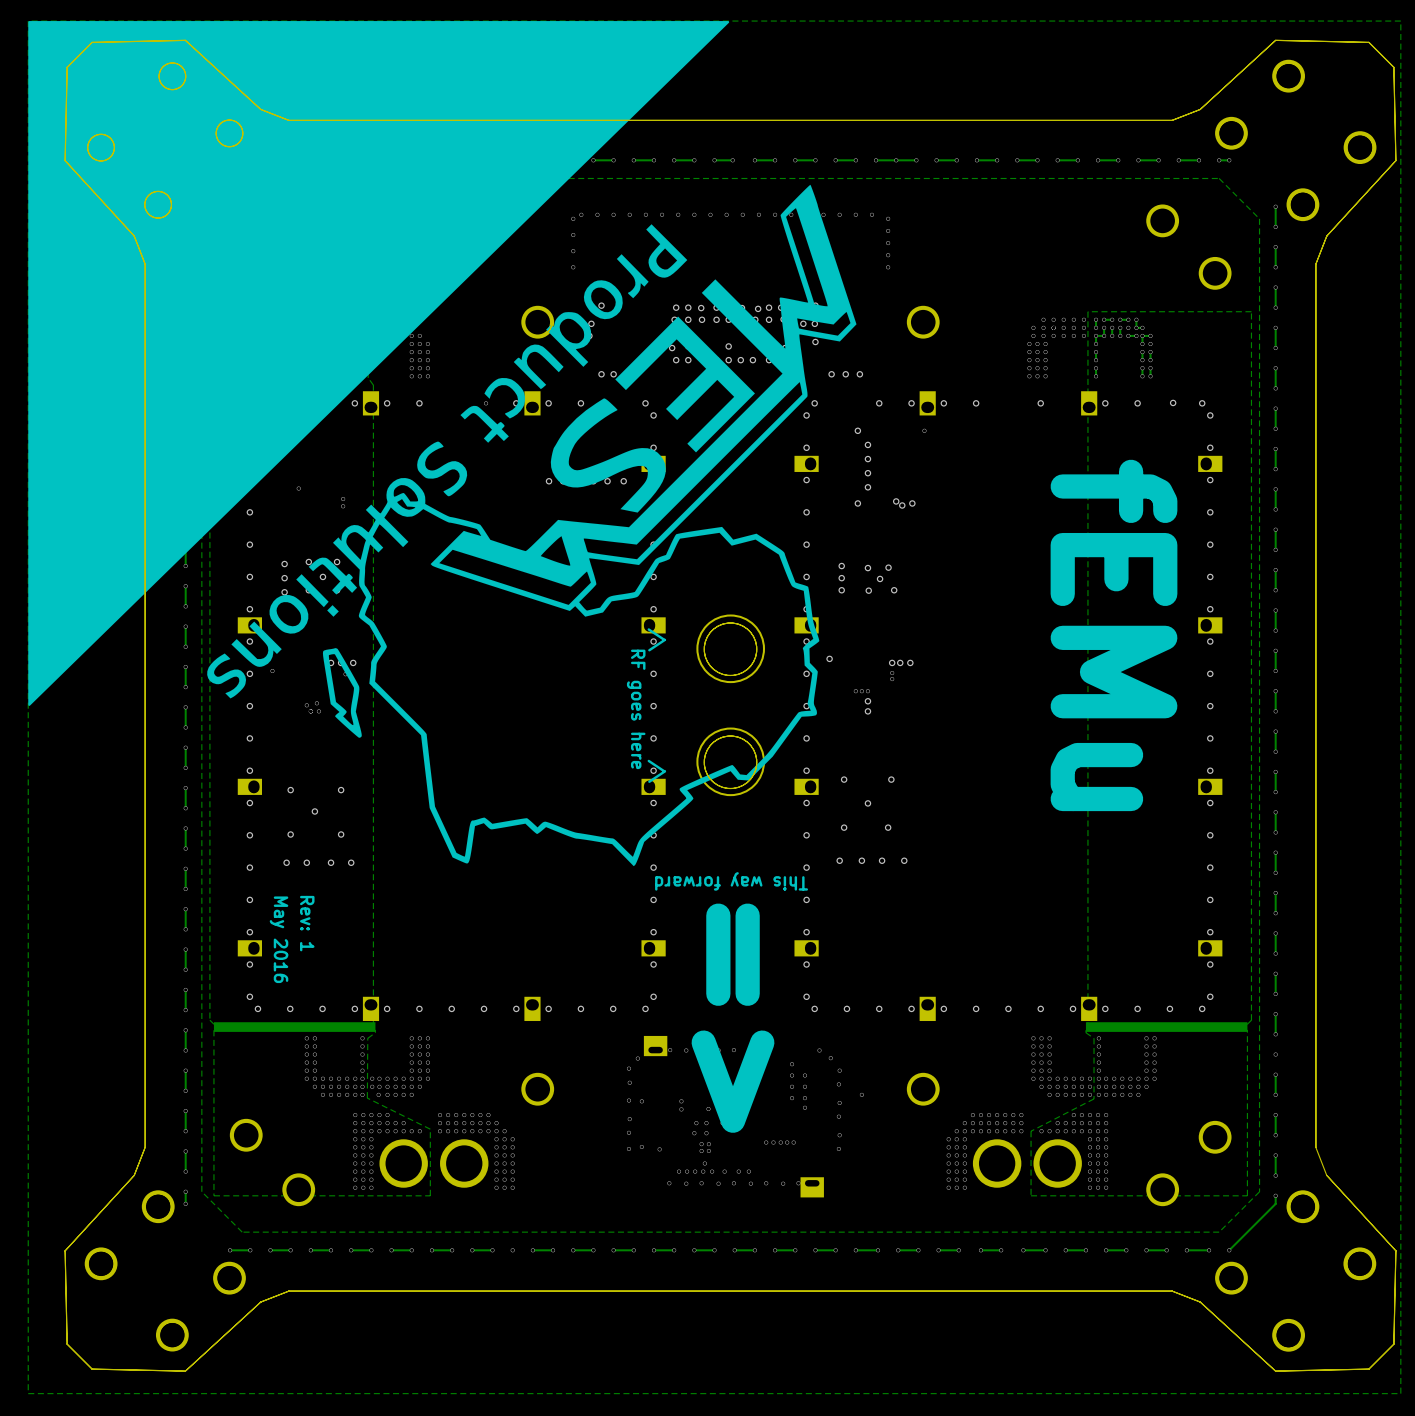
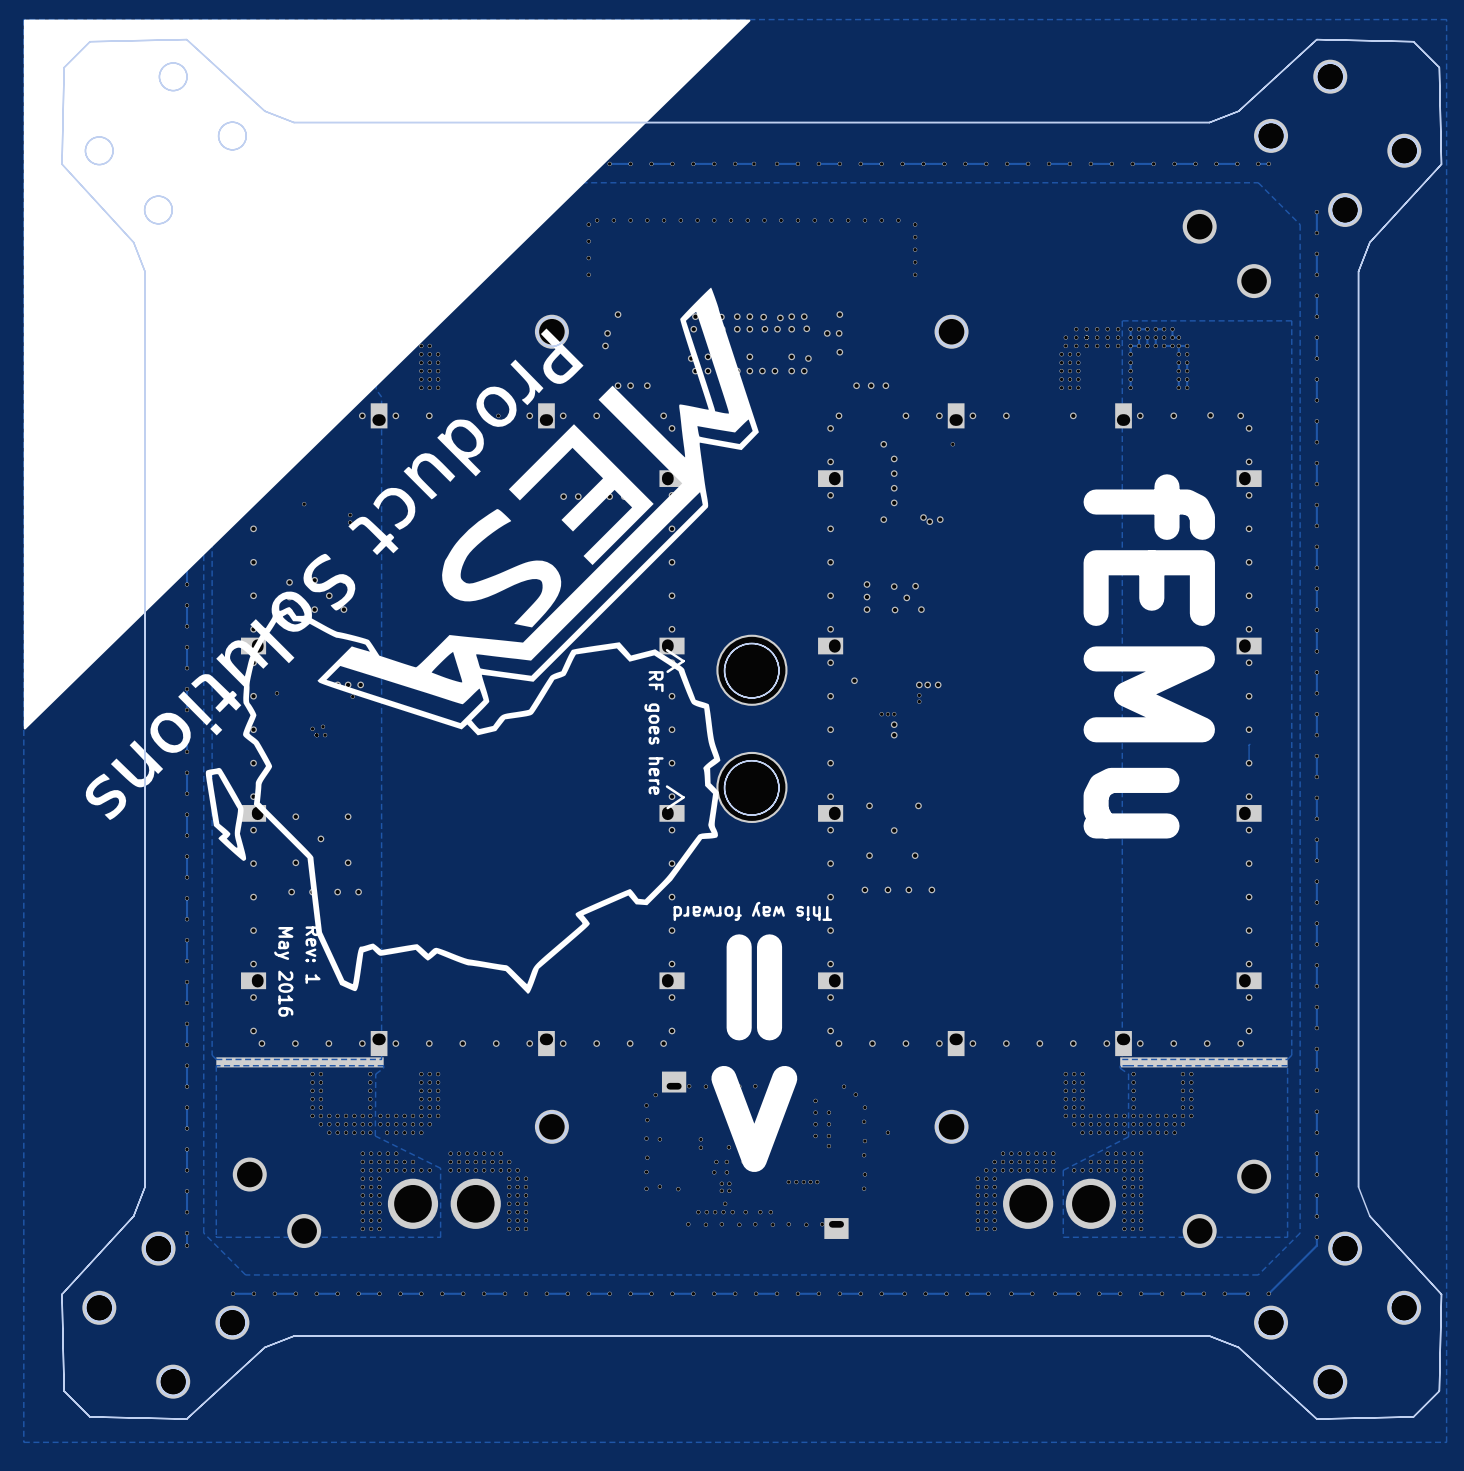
drawing position: (531, 525) -> (422, 640)
track: none -> (1249, 744) (1249, 763)

